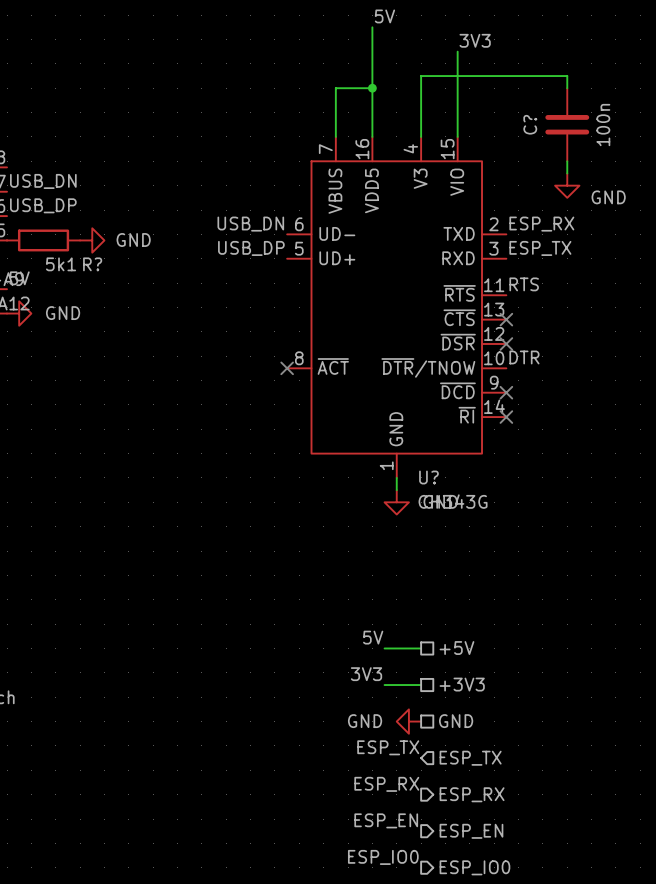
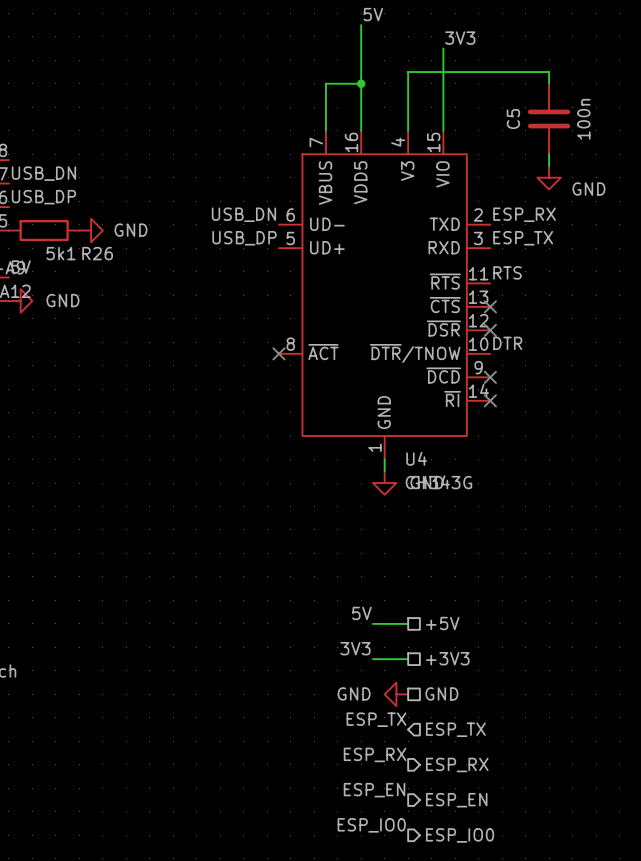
C? name: C? (530, 124) -> C5 (513, 118)
R? name: R? (92, 264) -> R26 (97, 253)
U? name: U? (428, 477) -> U4 (416, 458)

